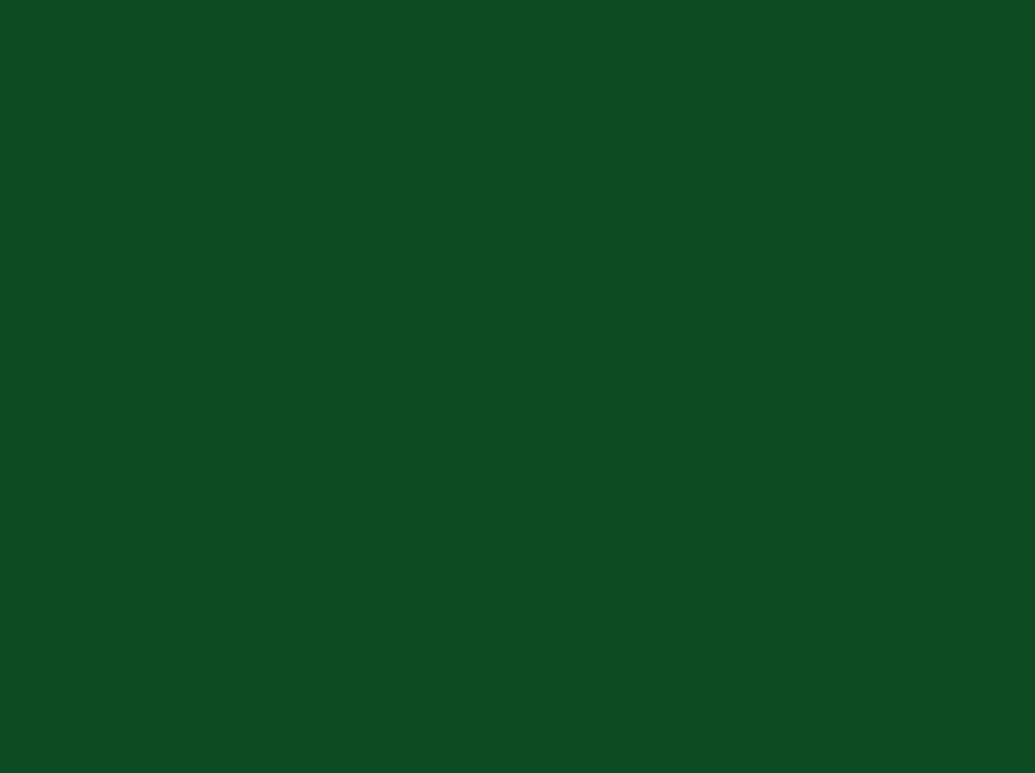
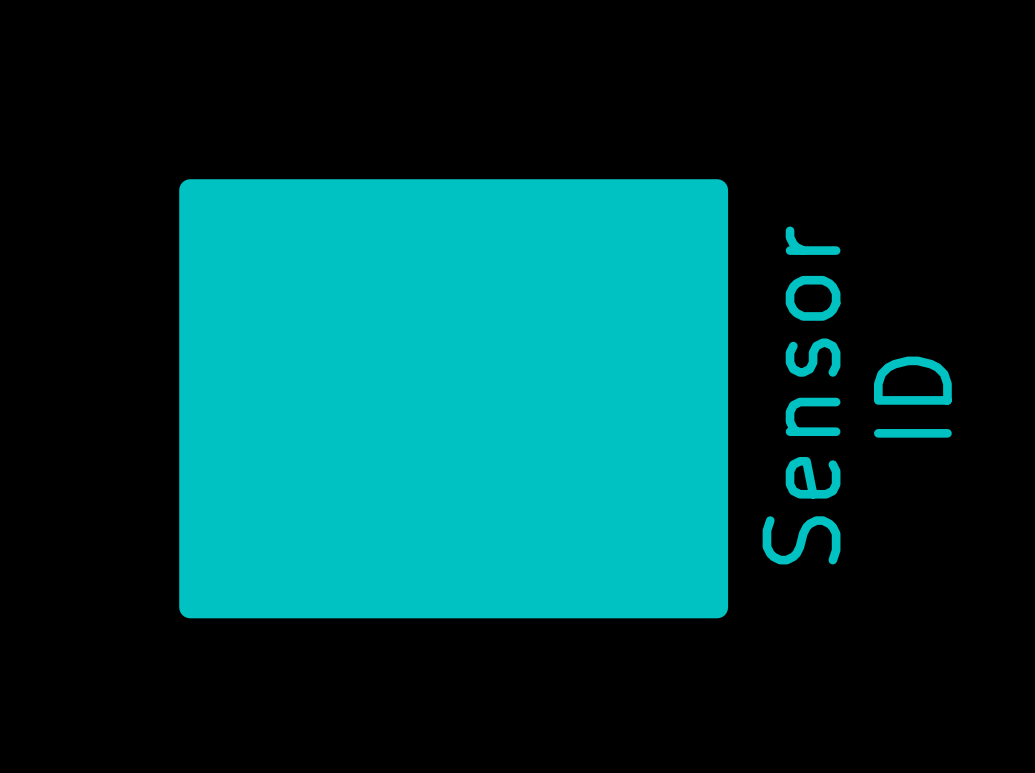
drawing: none -> [179, 179, 729, 619]
text: none -> ID (912, 397)
text: none -> Sensor (801, 395)

